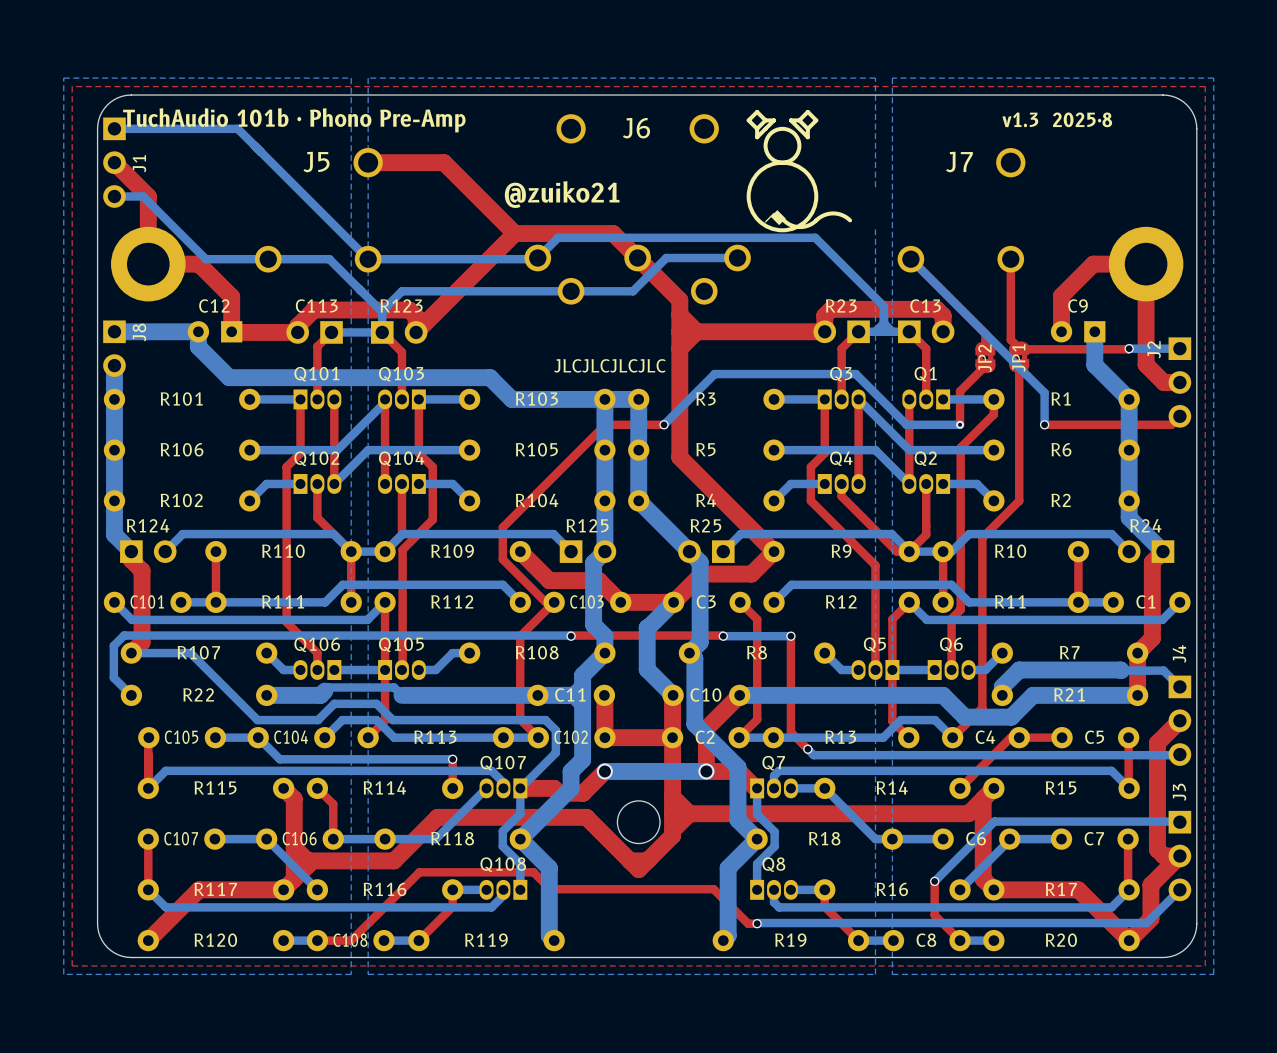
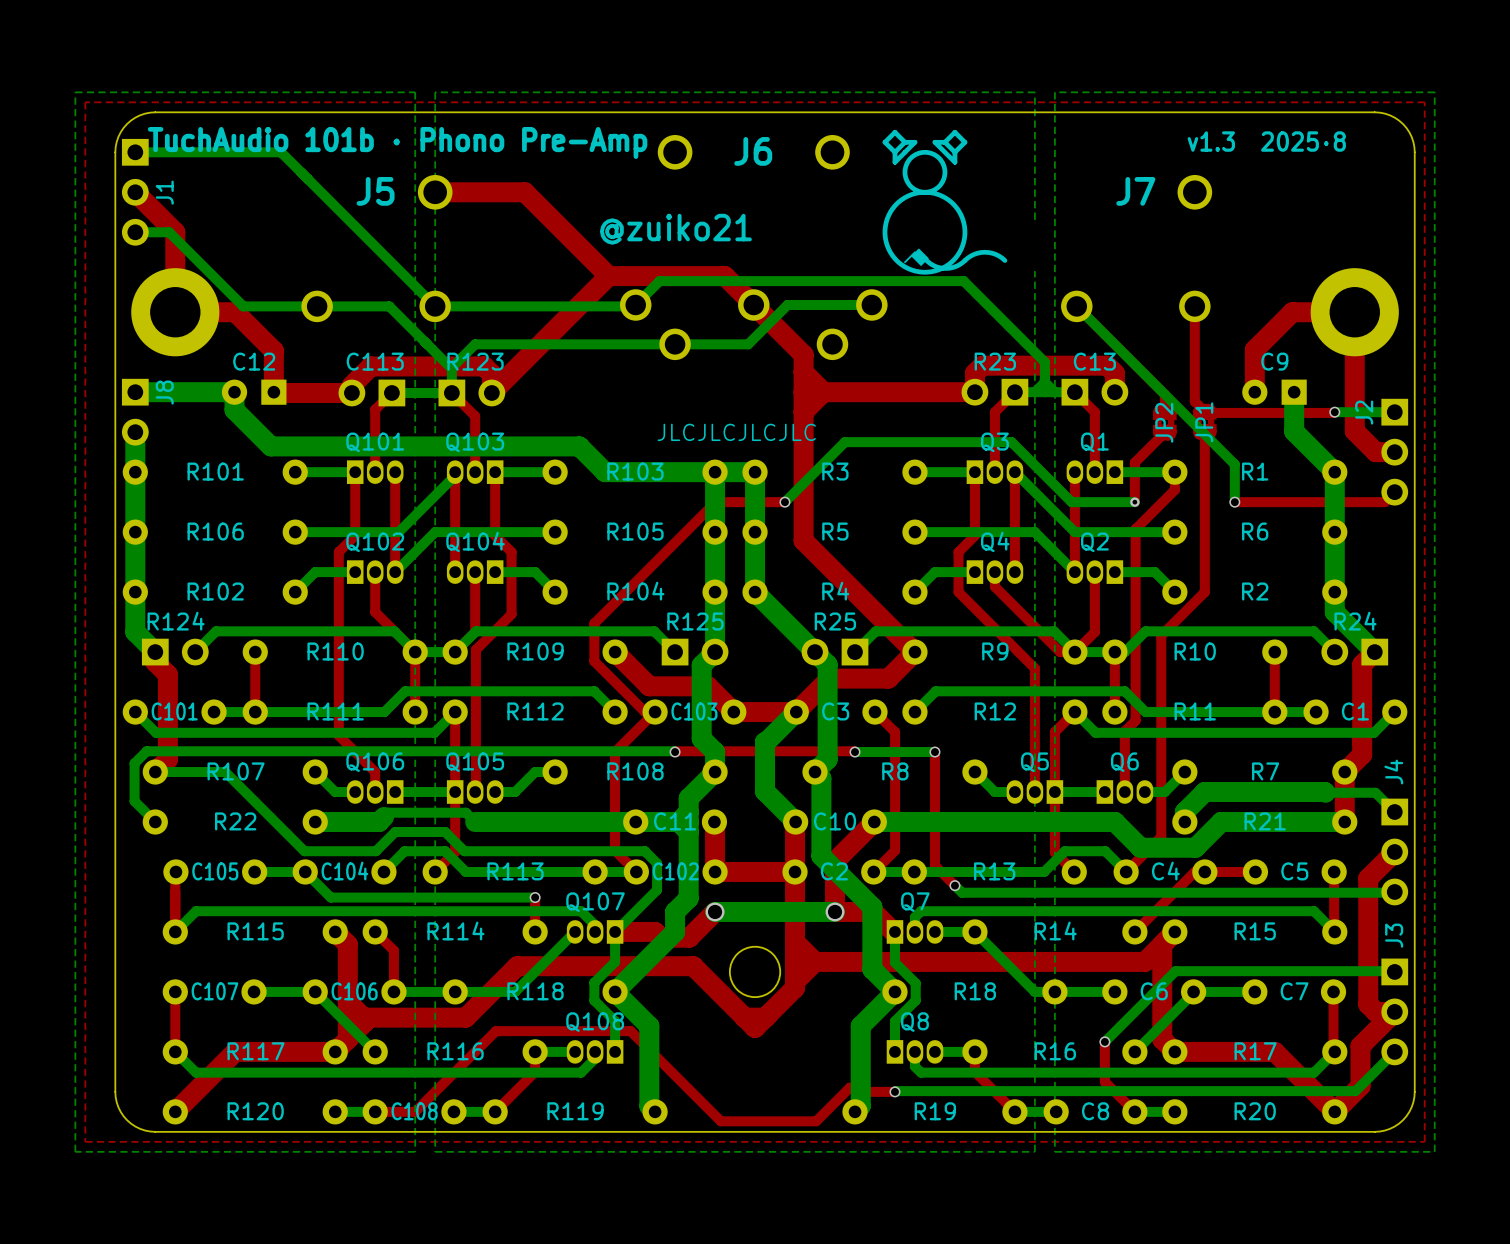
top track: (550, 889) (713, 889) (748, 923) -> (650, 1051) (720, 1121) (816, 1121) (849, 1087) (862, 1087) (866, 1091) (884, 1091)

